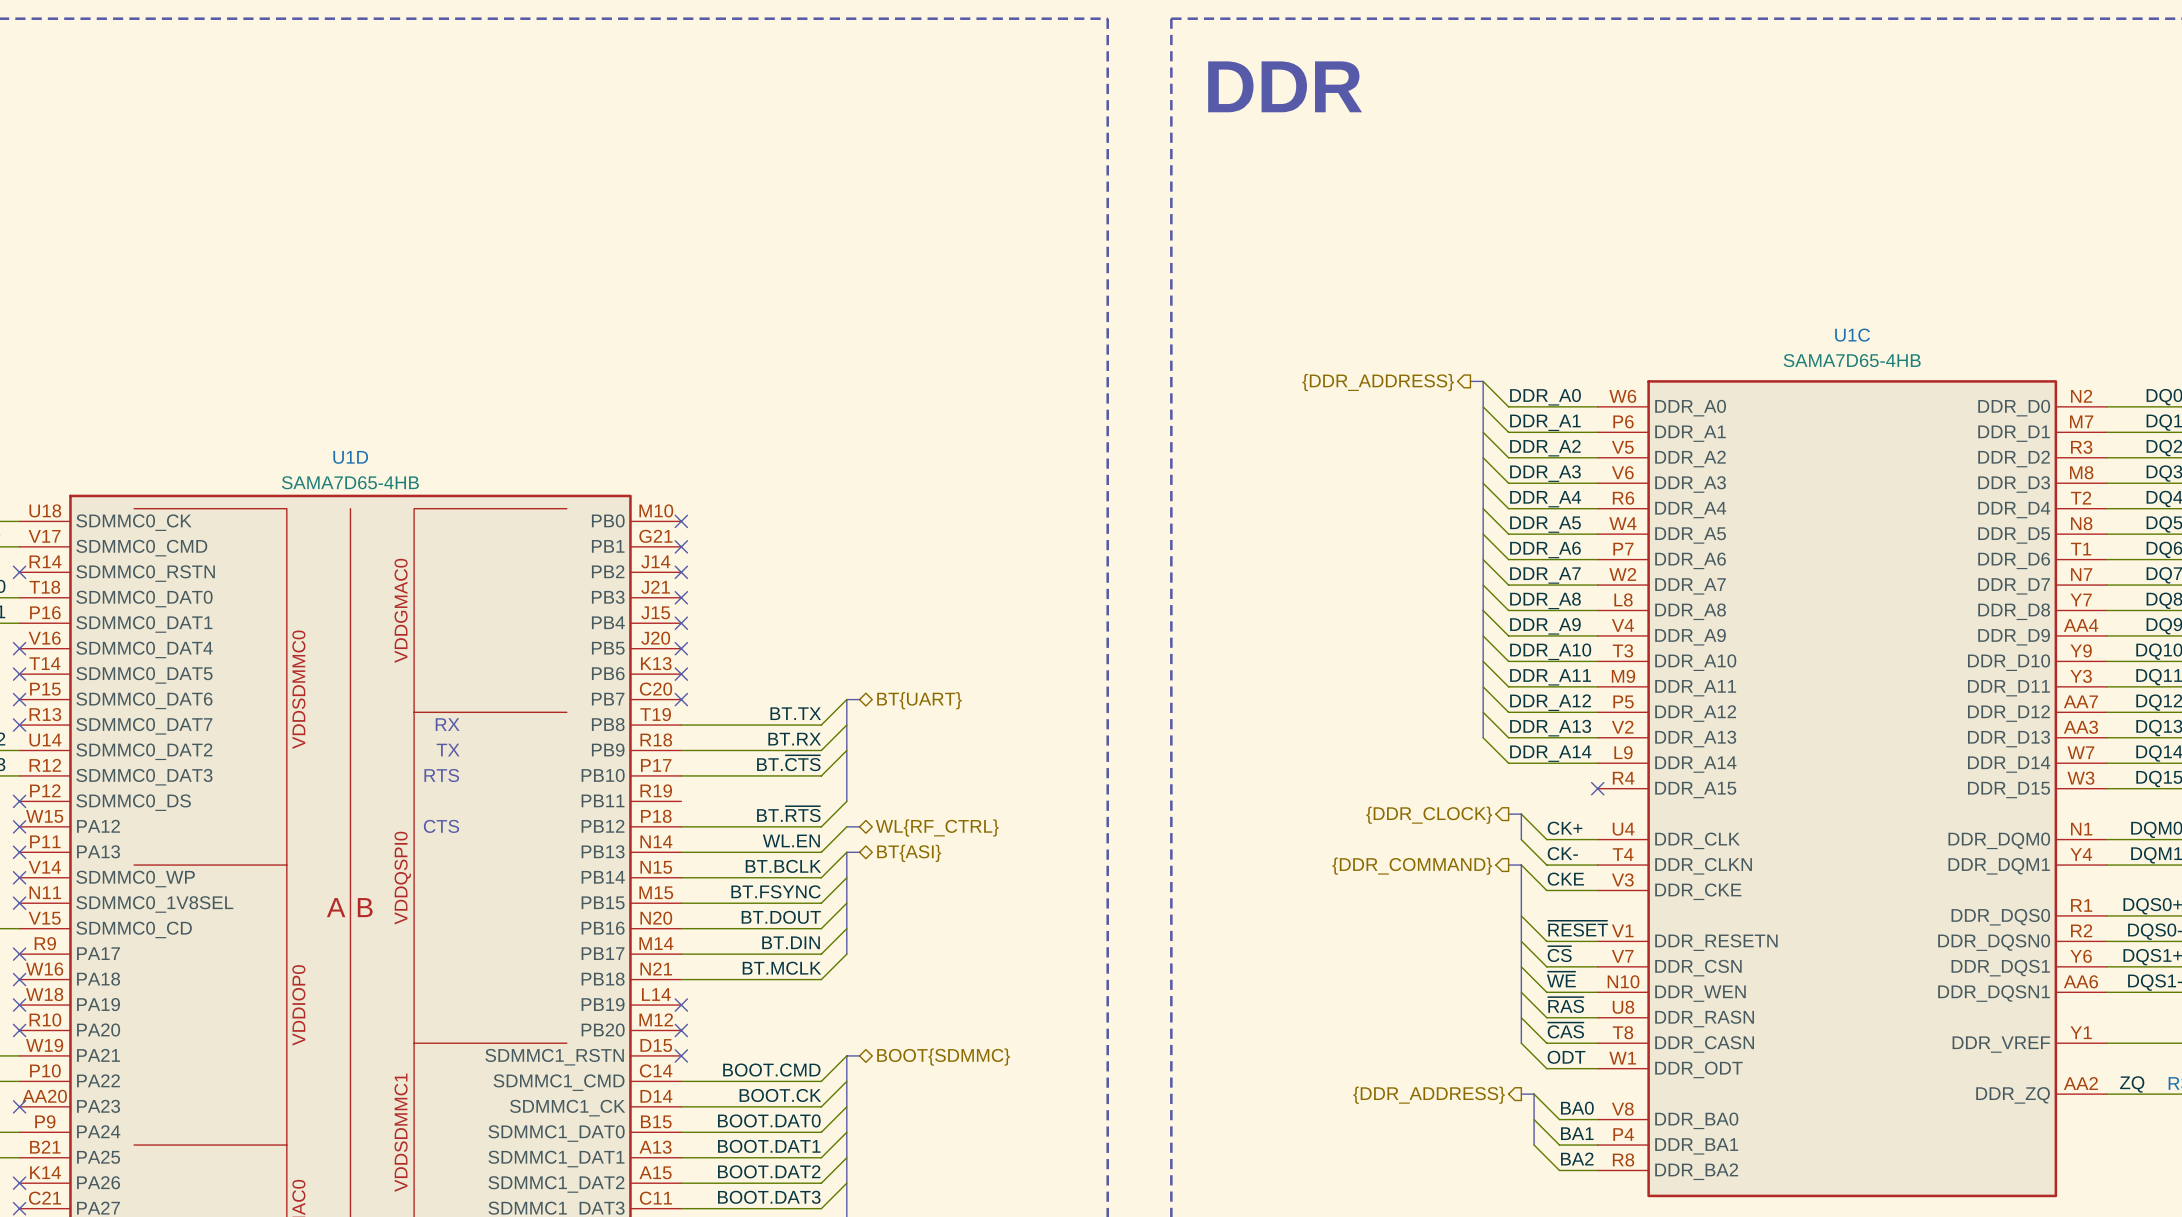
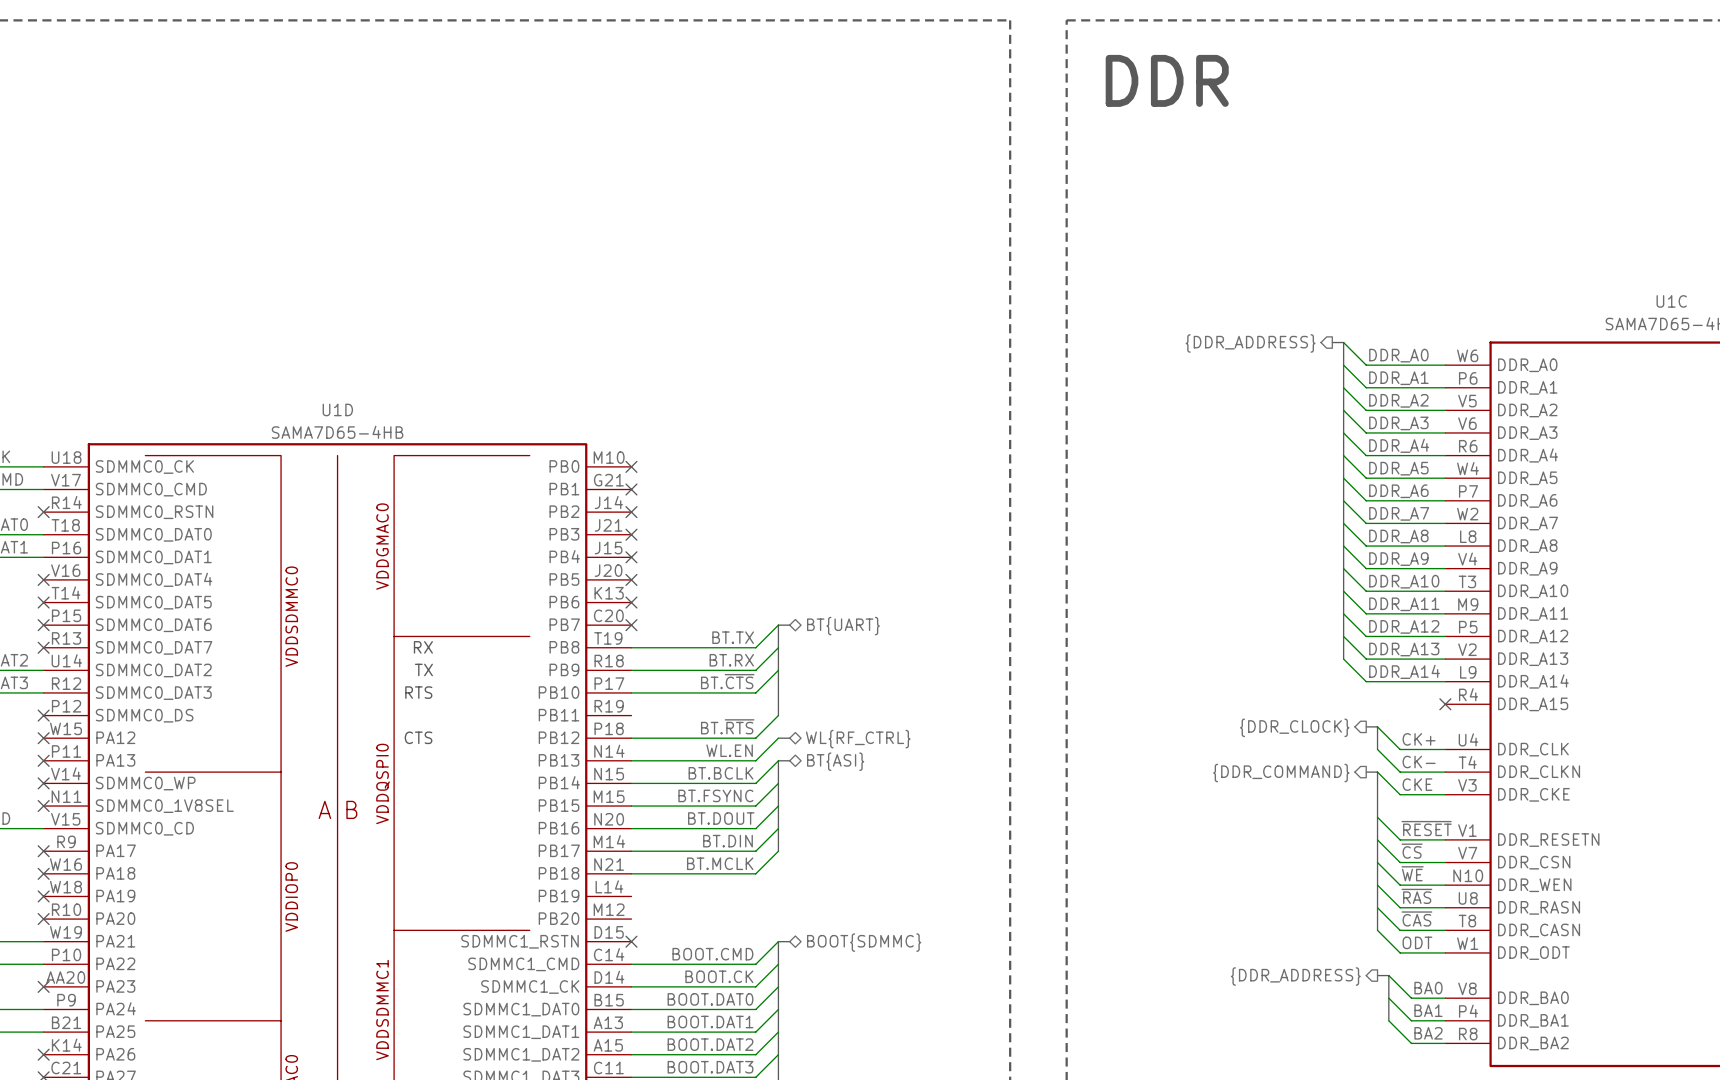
no-connect mark: (681, 1005) -> none
no-connect mark: (681, 1030) -> none

